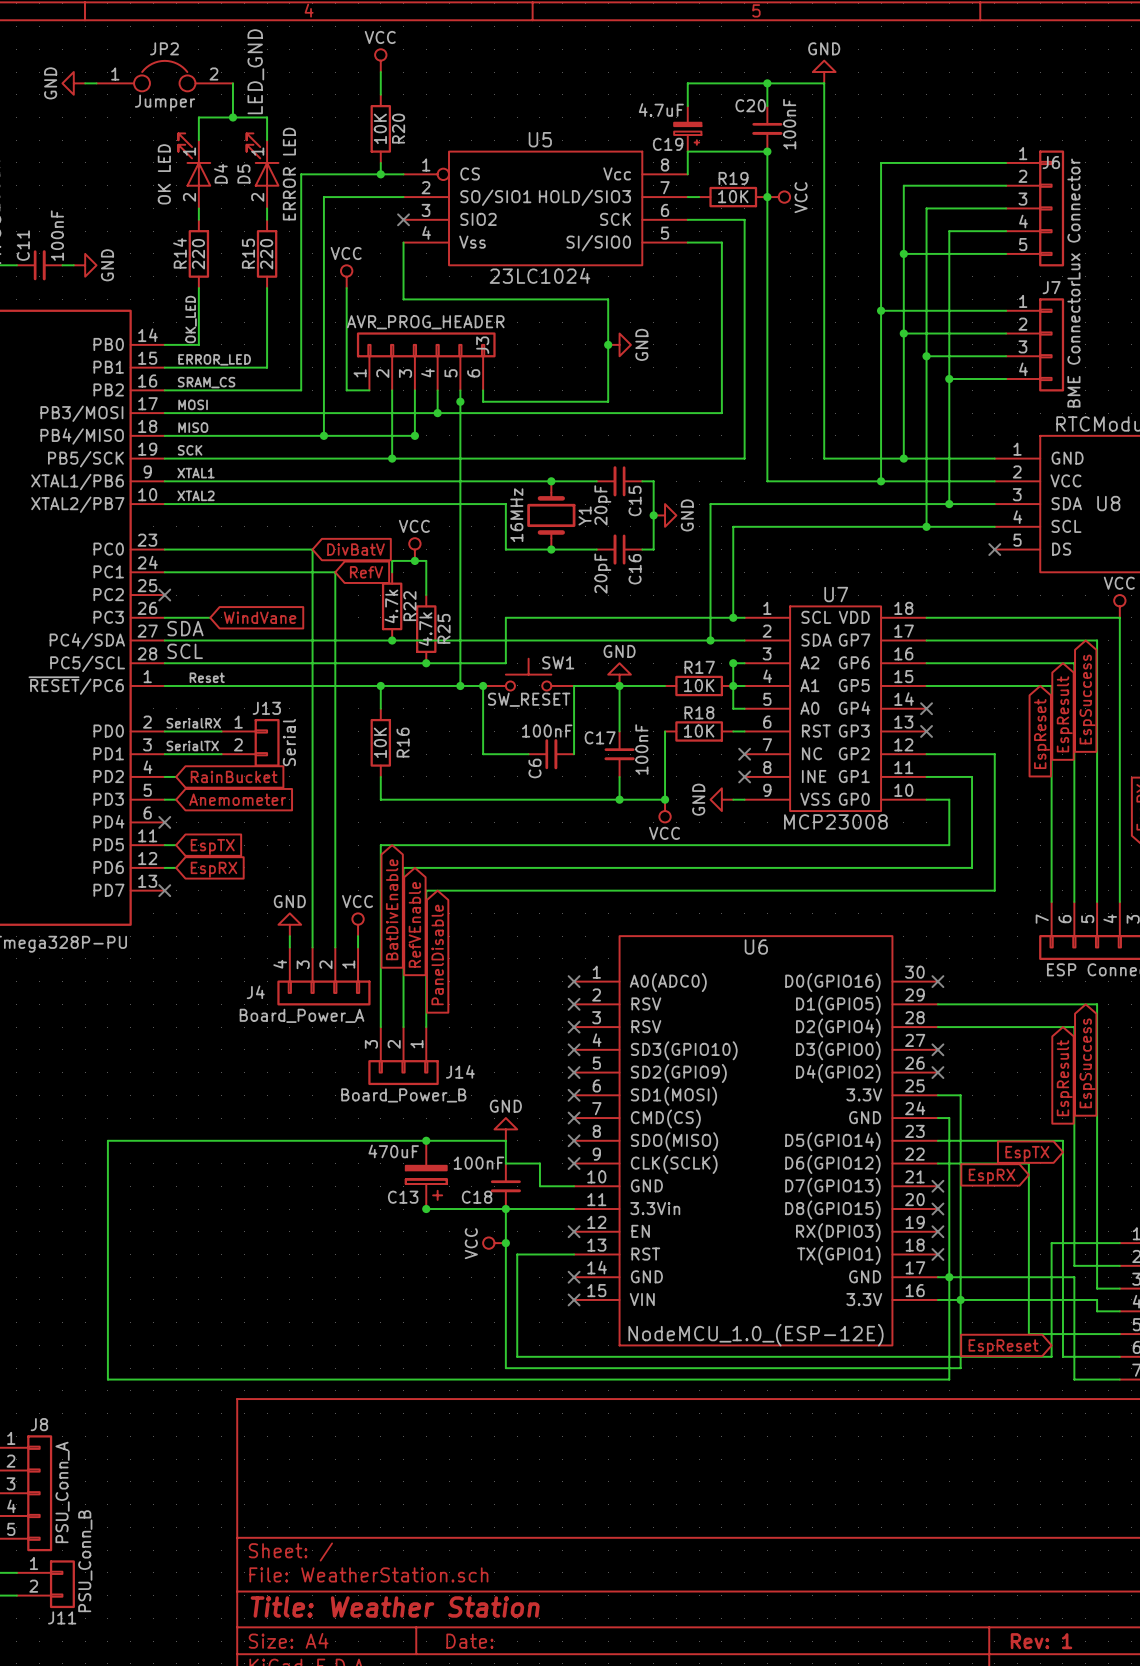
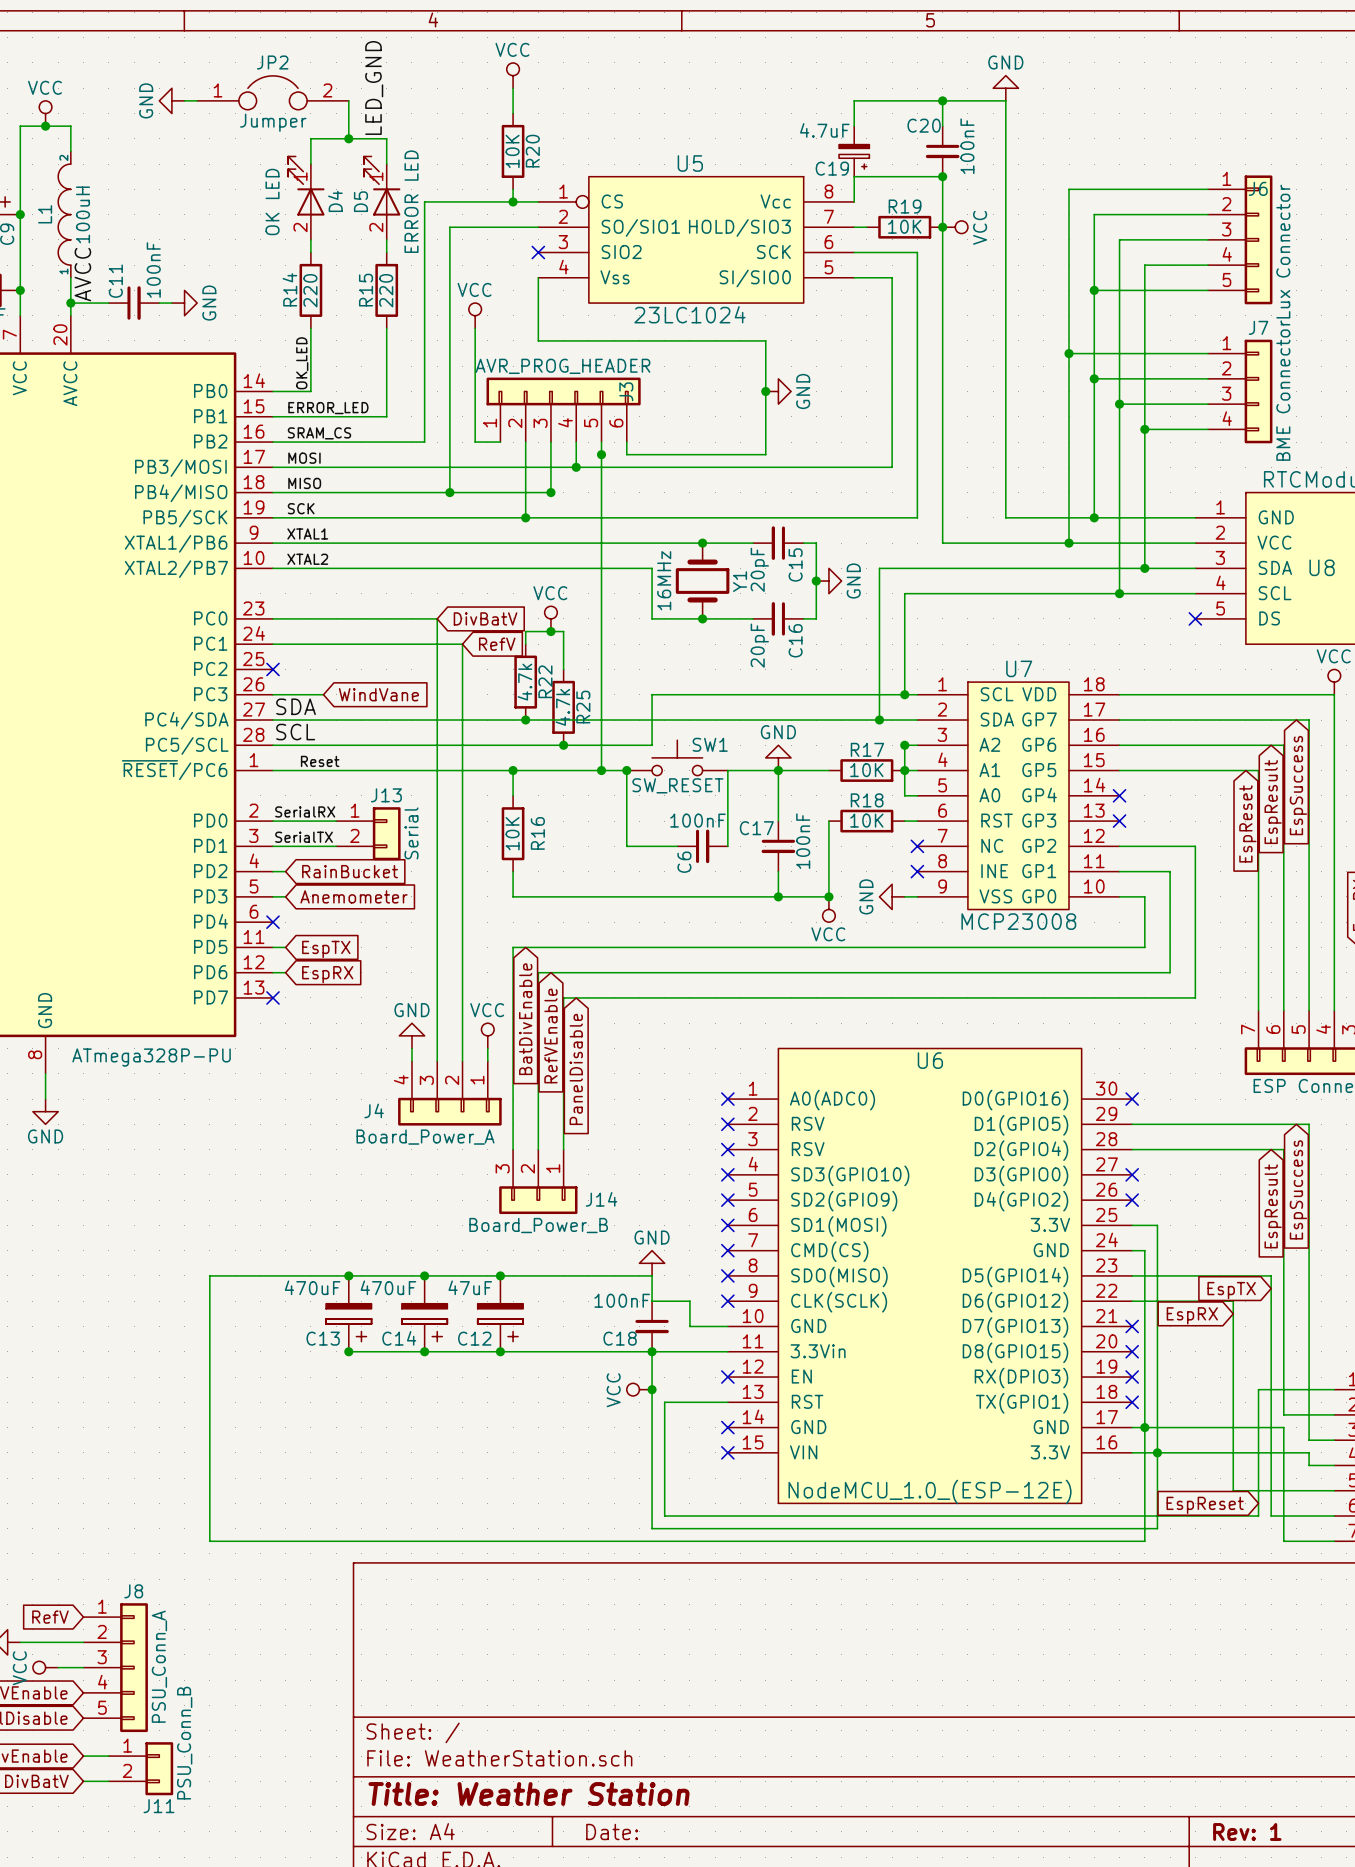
junction: none -> (348, 1275)
junction: none -> (424, 1275)
junction: none -> (500, 1275)
junction: (426, 1140) -> none
C14: none -> 470uF (424, 1313)
C12: none -> 47uF (500, 1313)
C13 position: (426, 1174) -> (348, 1313)
wire: none -> (348, 1351) (563, 1351)
junction: none -> (348, 1351)
junction: none -> (424, 1351)
junction: none -> (500, 1351)
junction: (426, 1209) -> none

